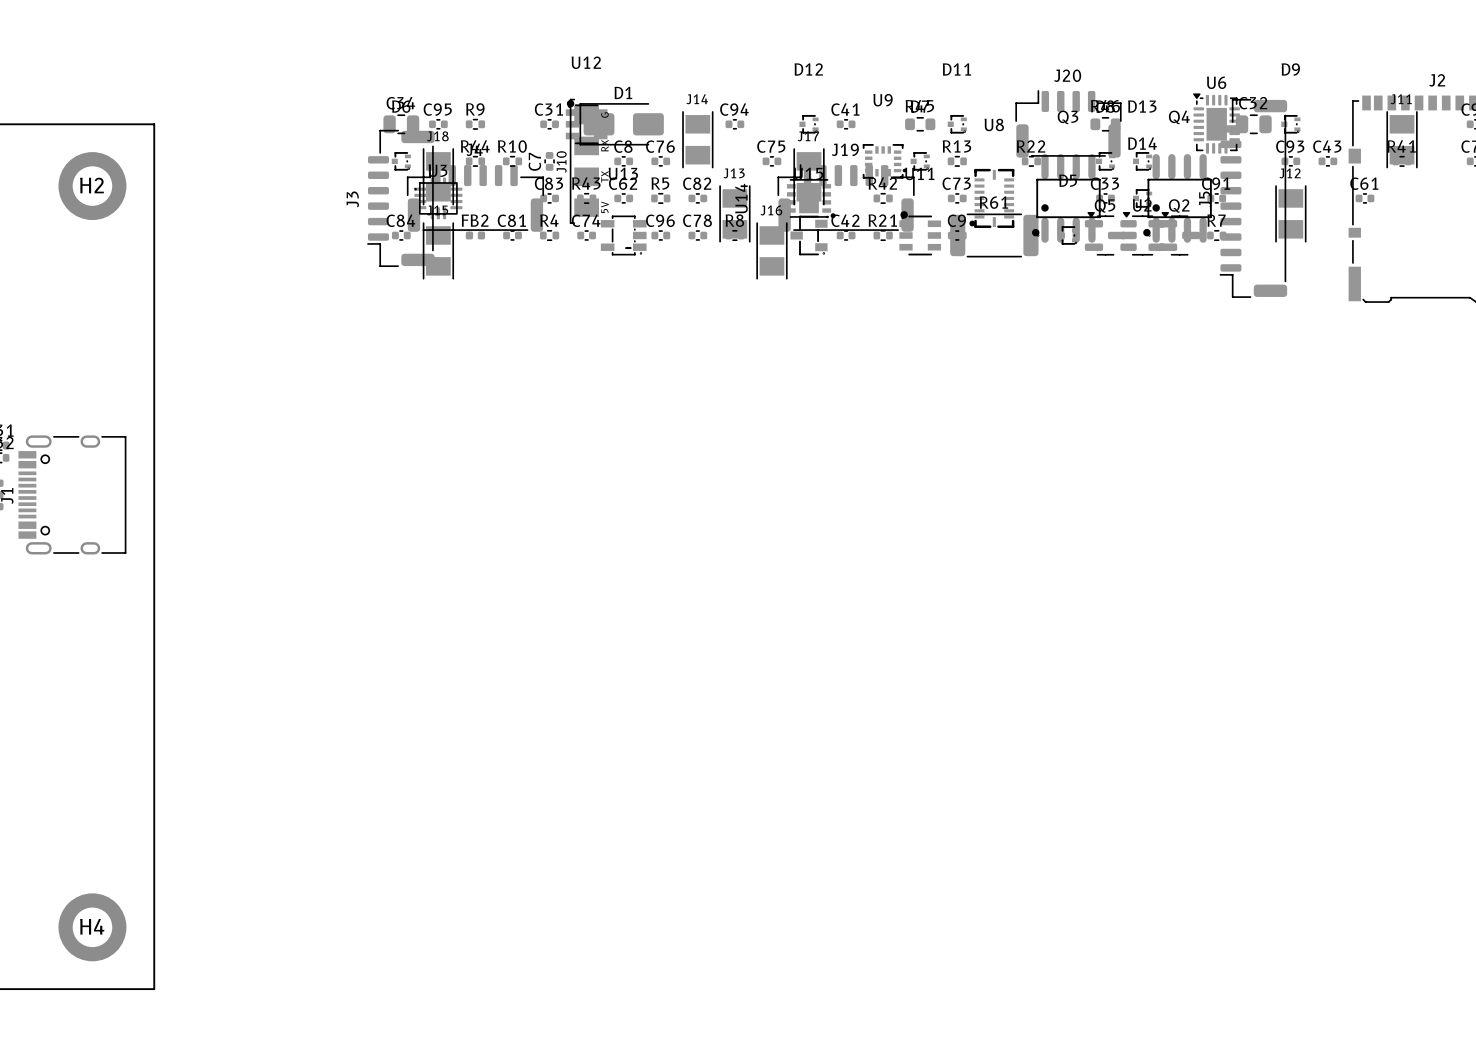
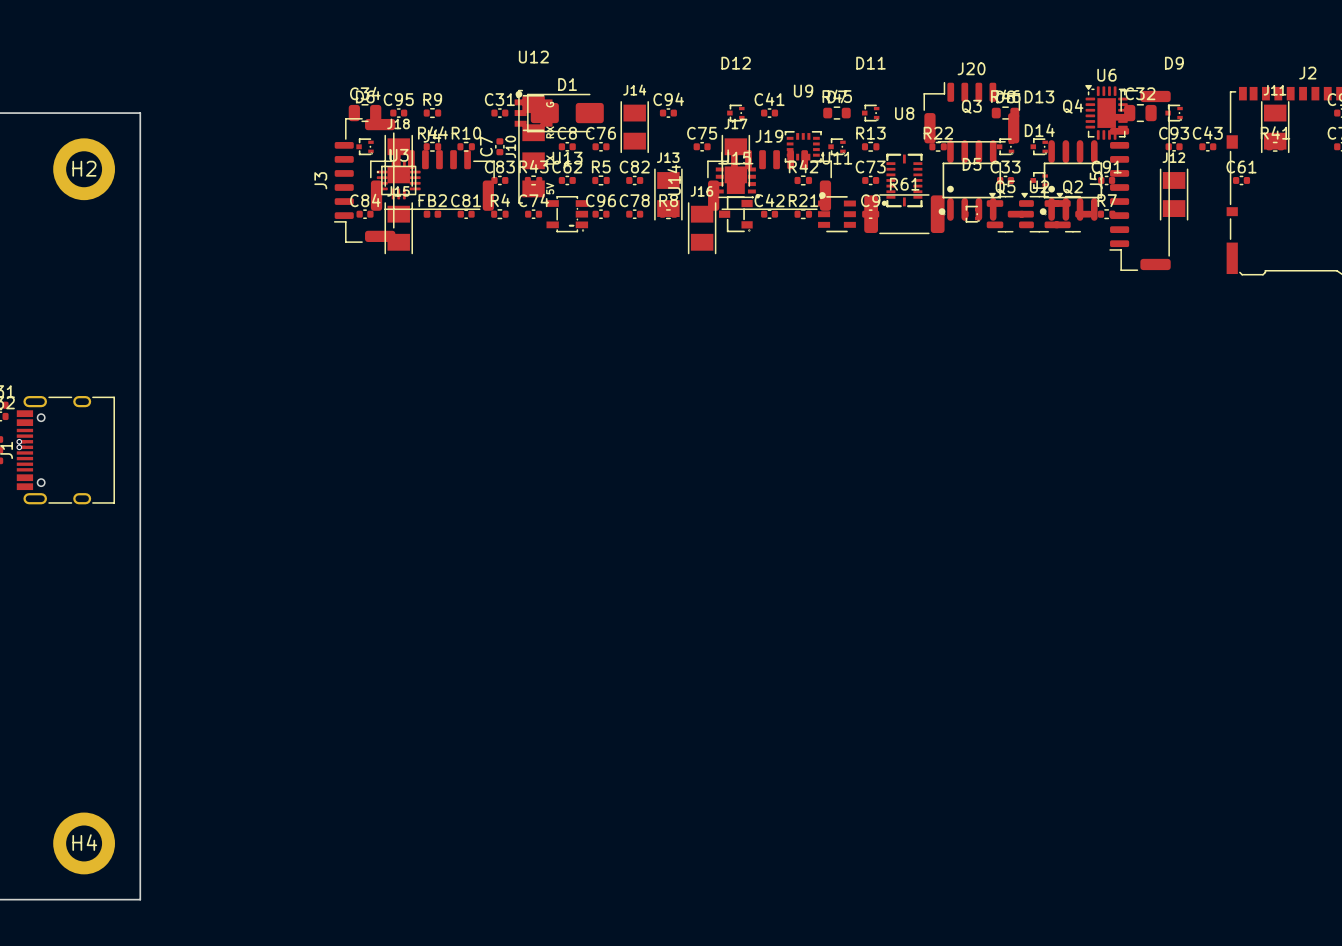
via: none -> (19, 441)
via: none -> (19, 447)

